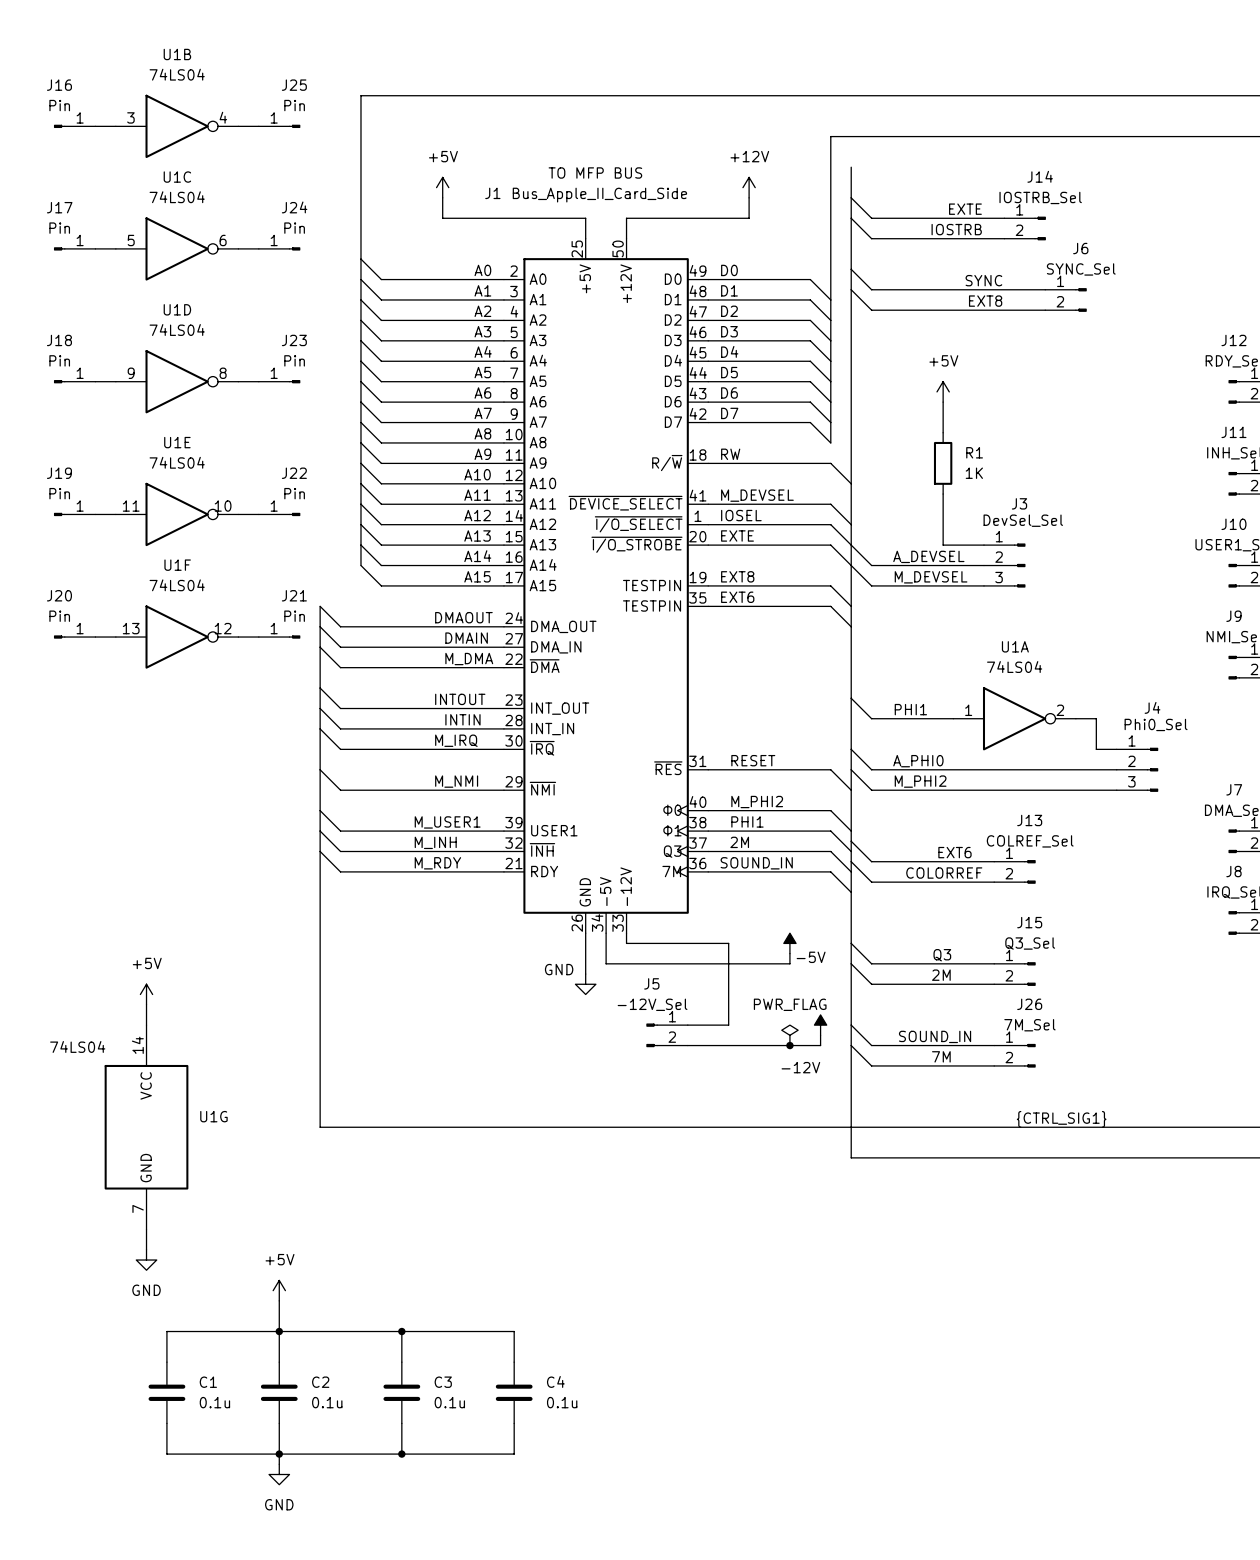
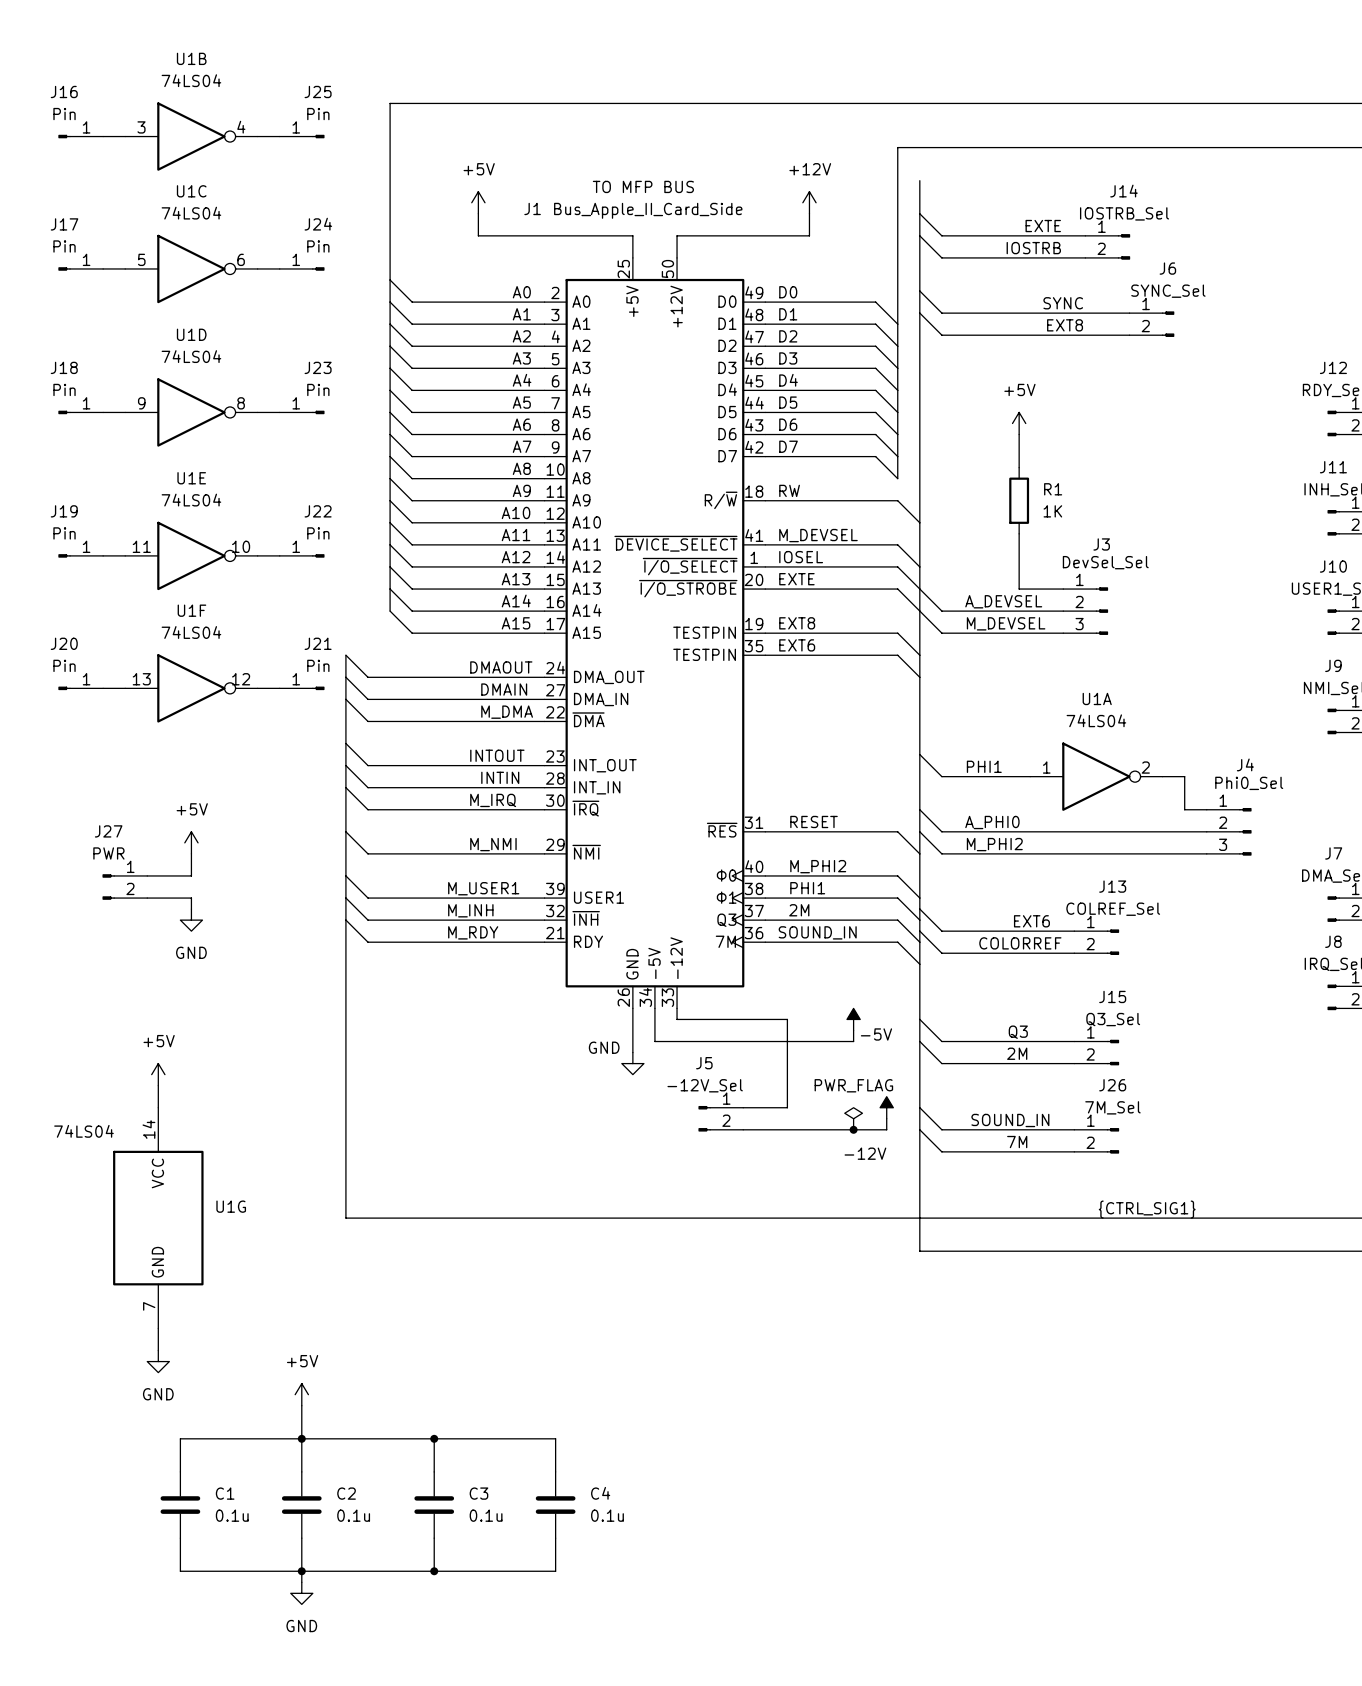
power symbol: none -> +5V (191, 842)
wire: none -> (191, 853) (191, 875) (147, 875)
J27: none -> PWR (124, 887)
wire: none -> (147, 898) (191, 898) (191, 909)
power symbol: none -> GND (191, 920)

